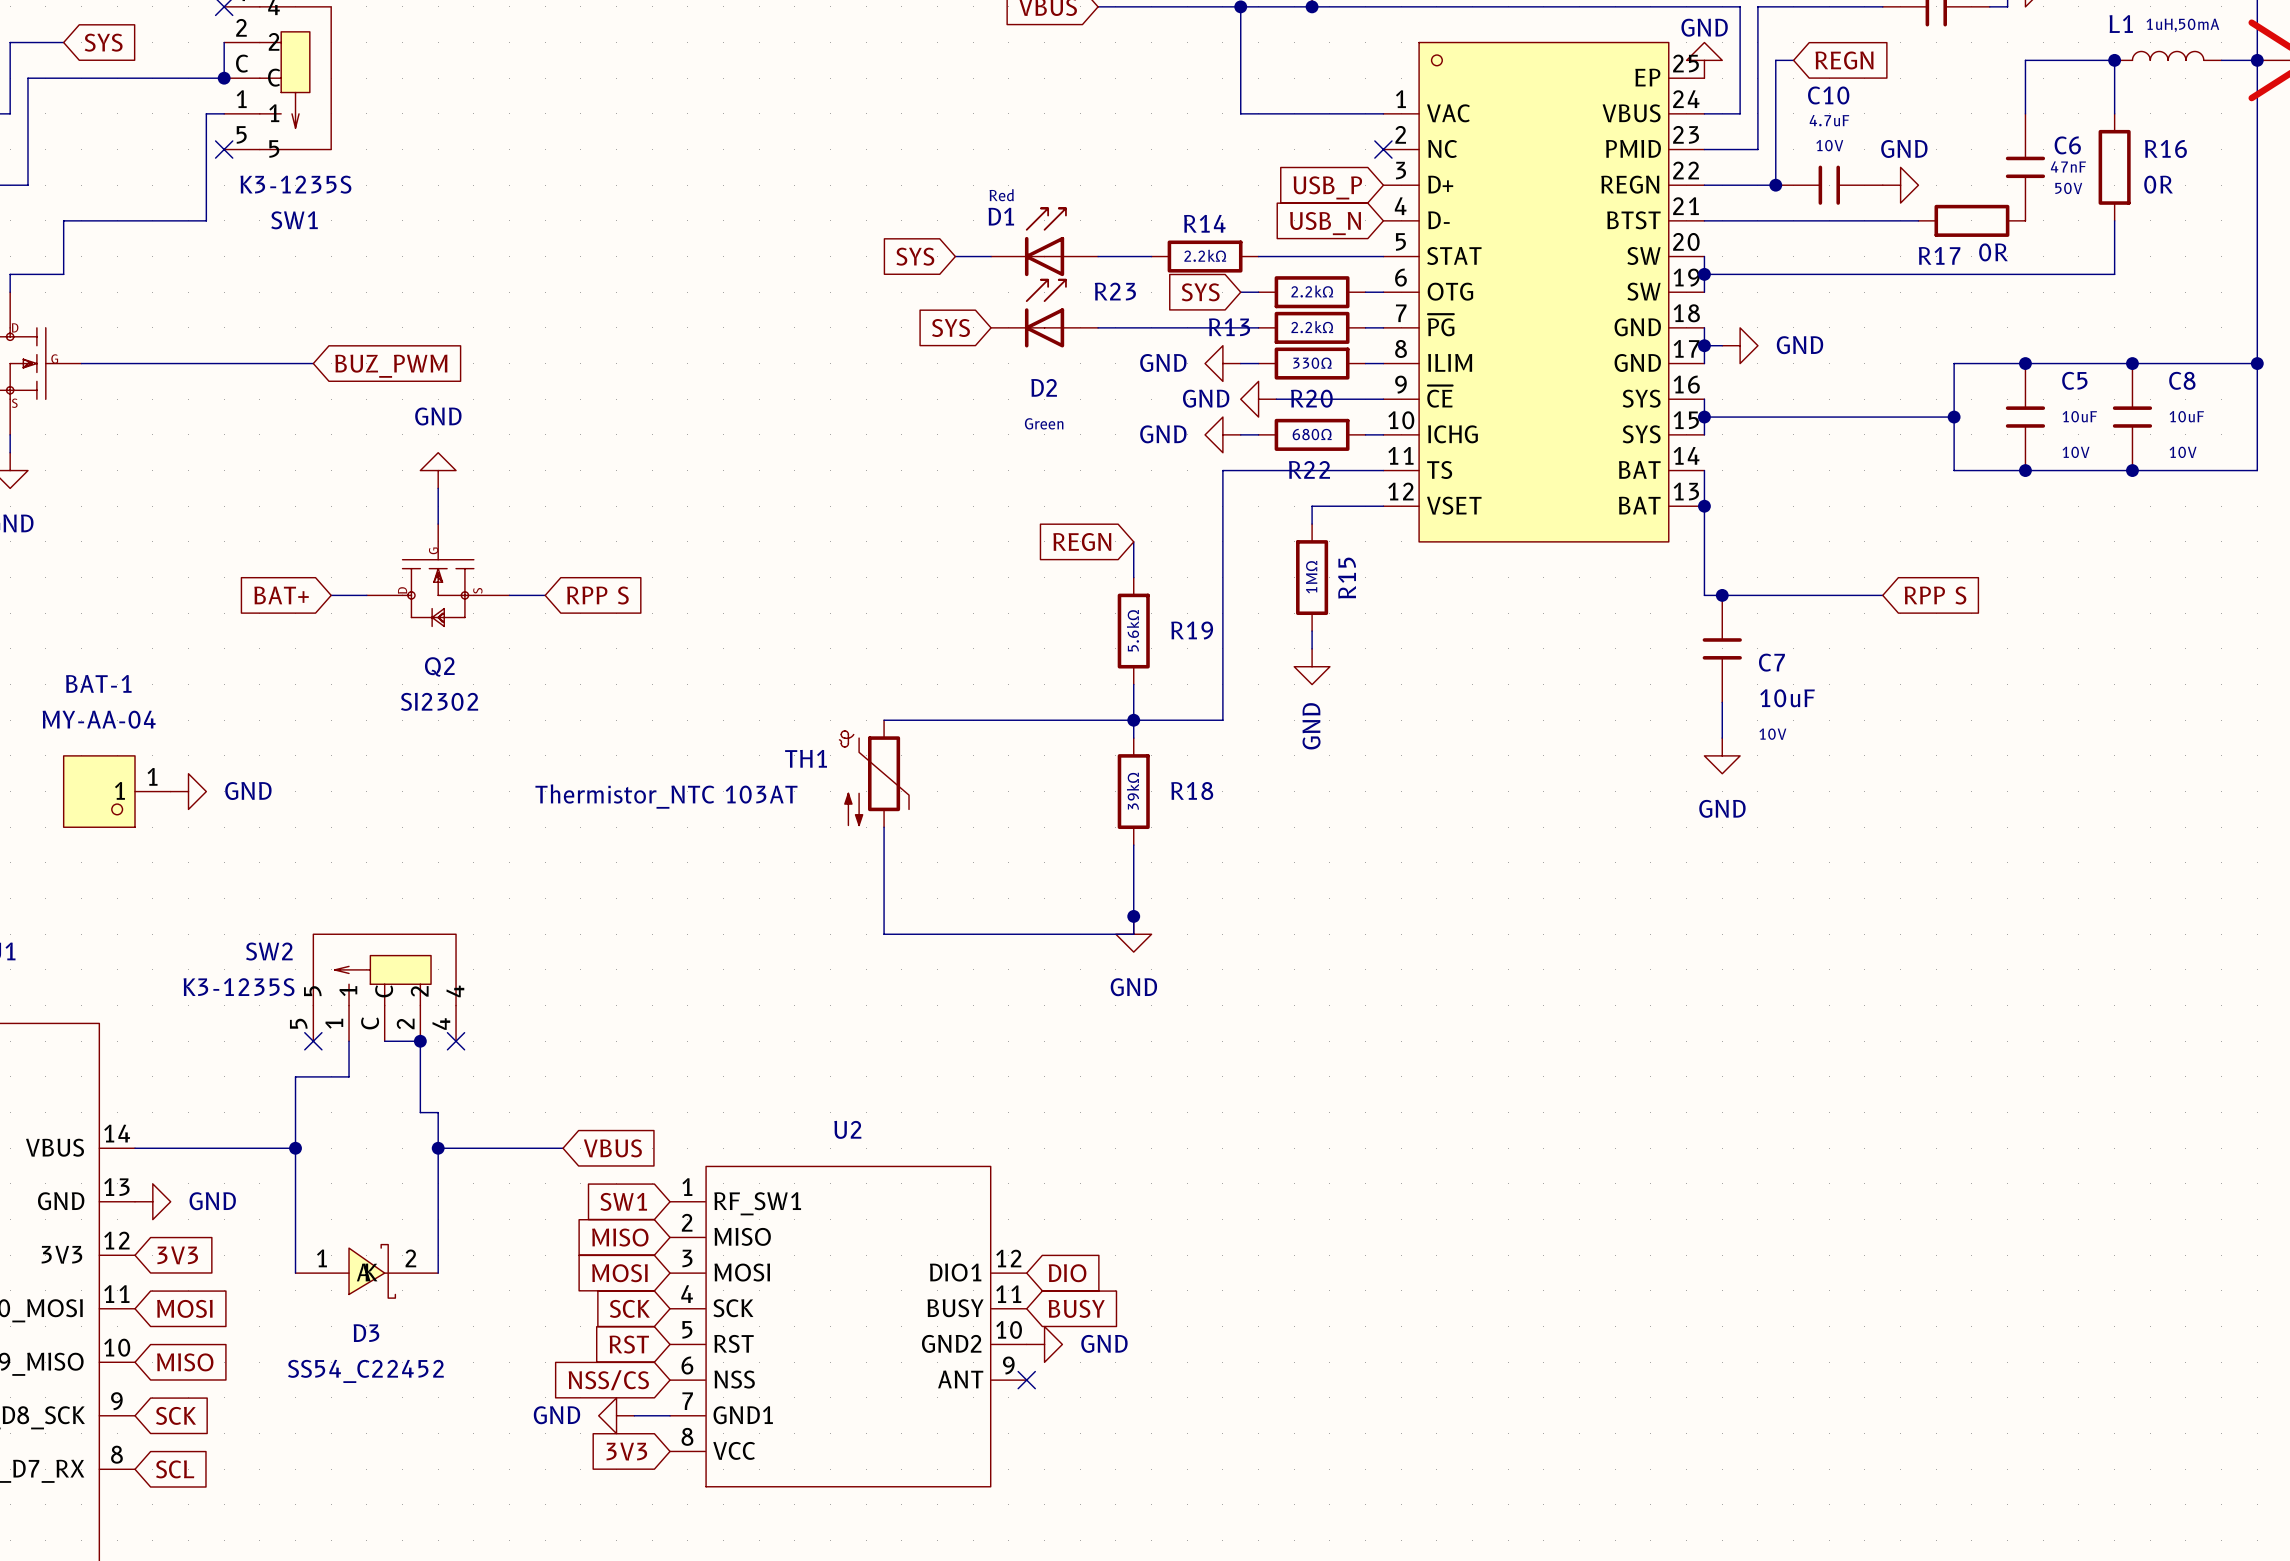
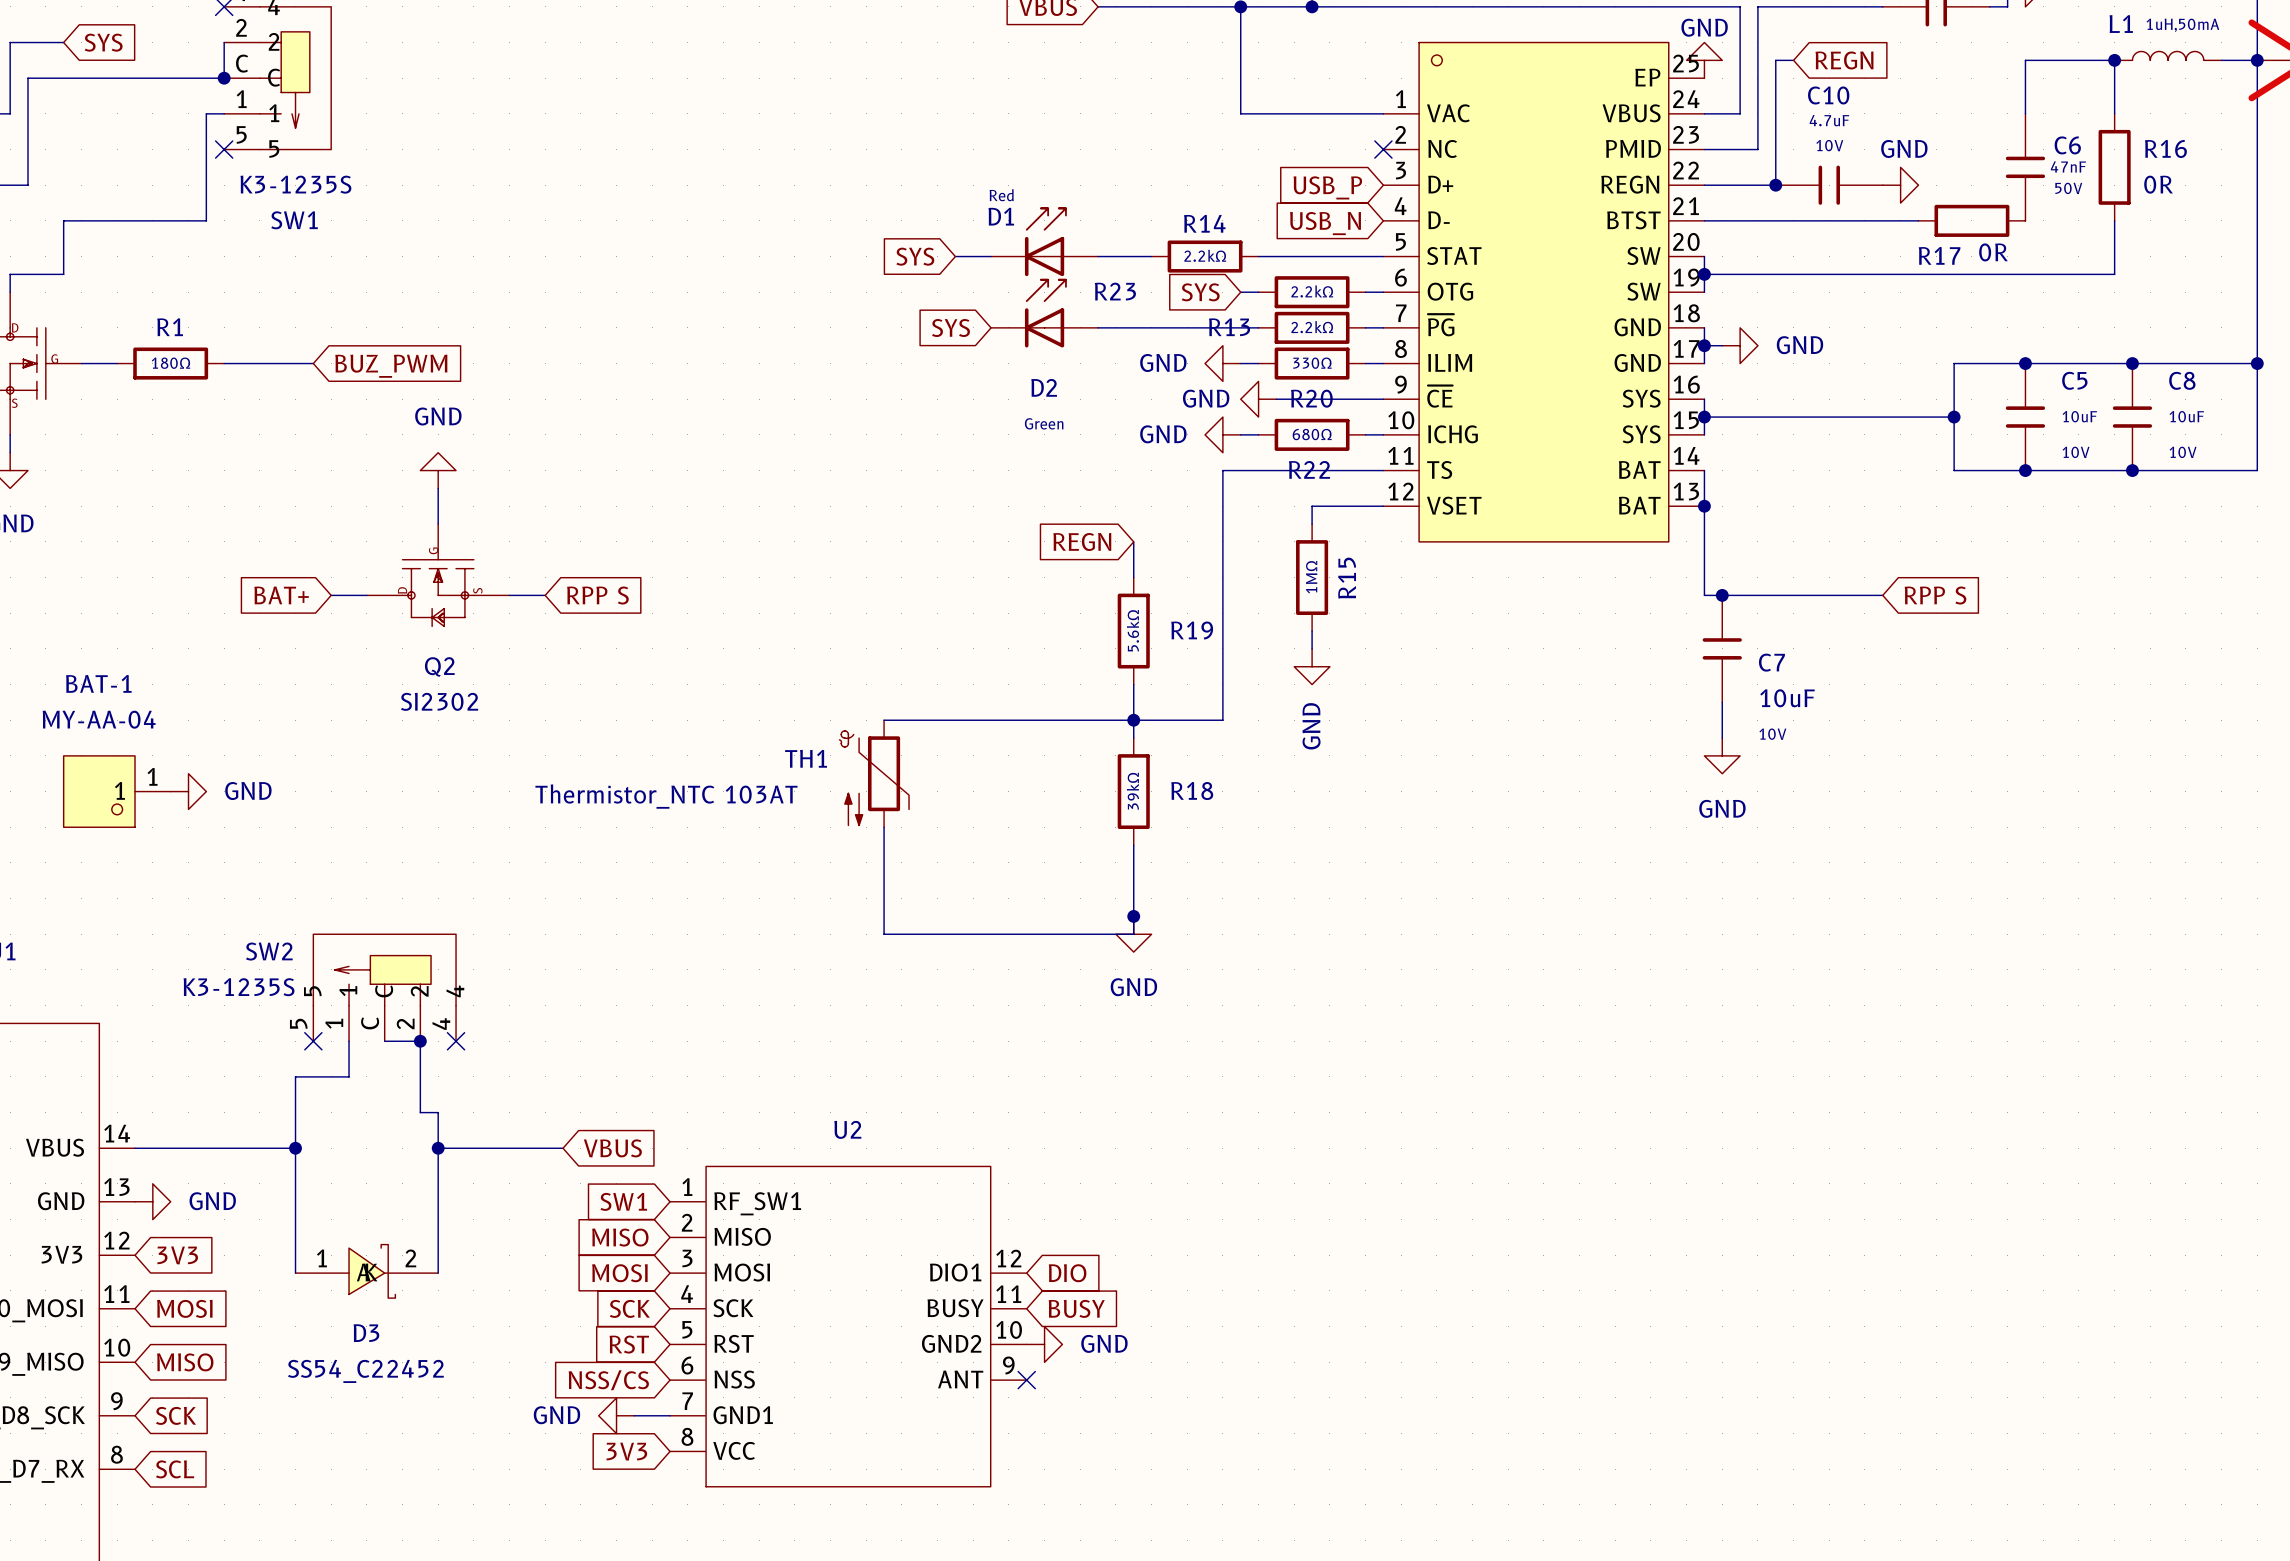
wire: (117, 363) (224, 363) -> none
R1: none -> 180Ω (170, 363)

